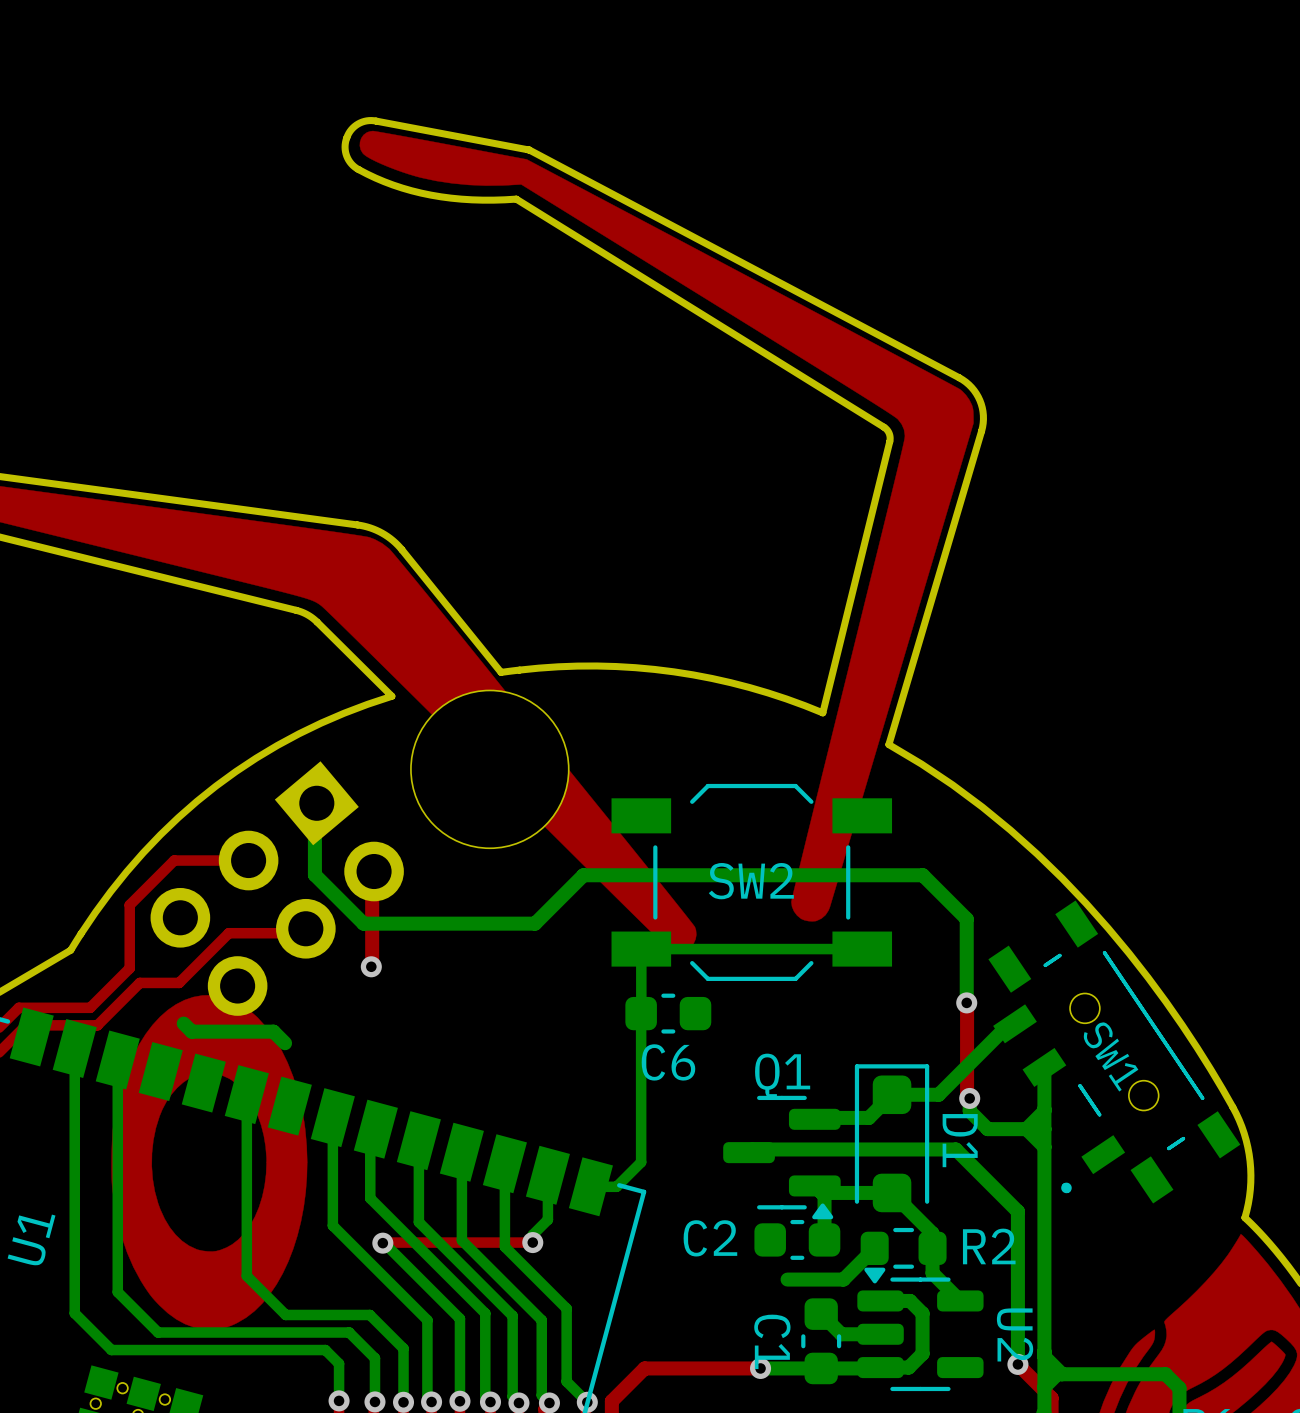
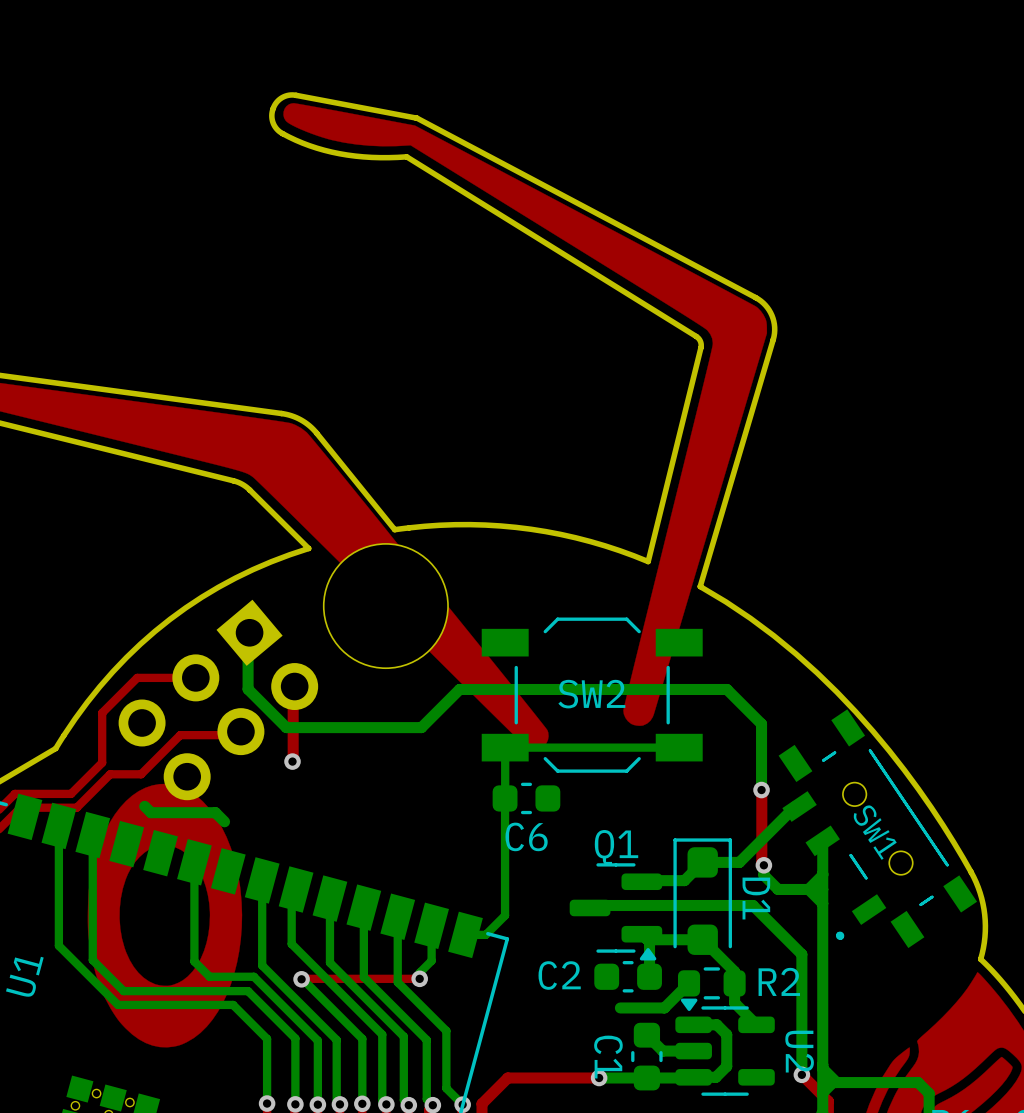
bottom track: (74, 1200) (74, 1313) (111, 1350) (325, 1350) (339, 1363) -> (58, 945) (118, 1004) (233, 1004) (267, 1038) (267, 1074)
bottom track: (117, 1218) (117, 1292) (158, 1332) (349, 1332) (374, 1358) -> (92, 960) (123, 991) (248, 991) (295, 1038) (295, 1069)
bottom track: (246, 1220) (246, 1276) (285, 1314) (369, 1314) (403, 1348) -> (194, 961) (209, 976) (253, 976) (317, 1040) (317, 1062)

